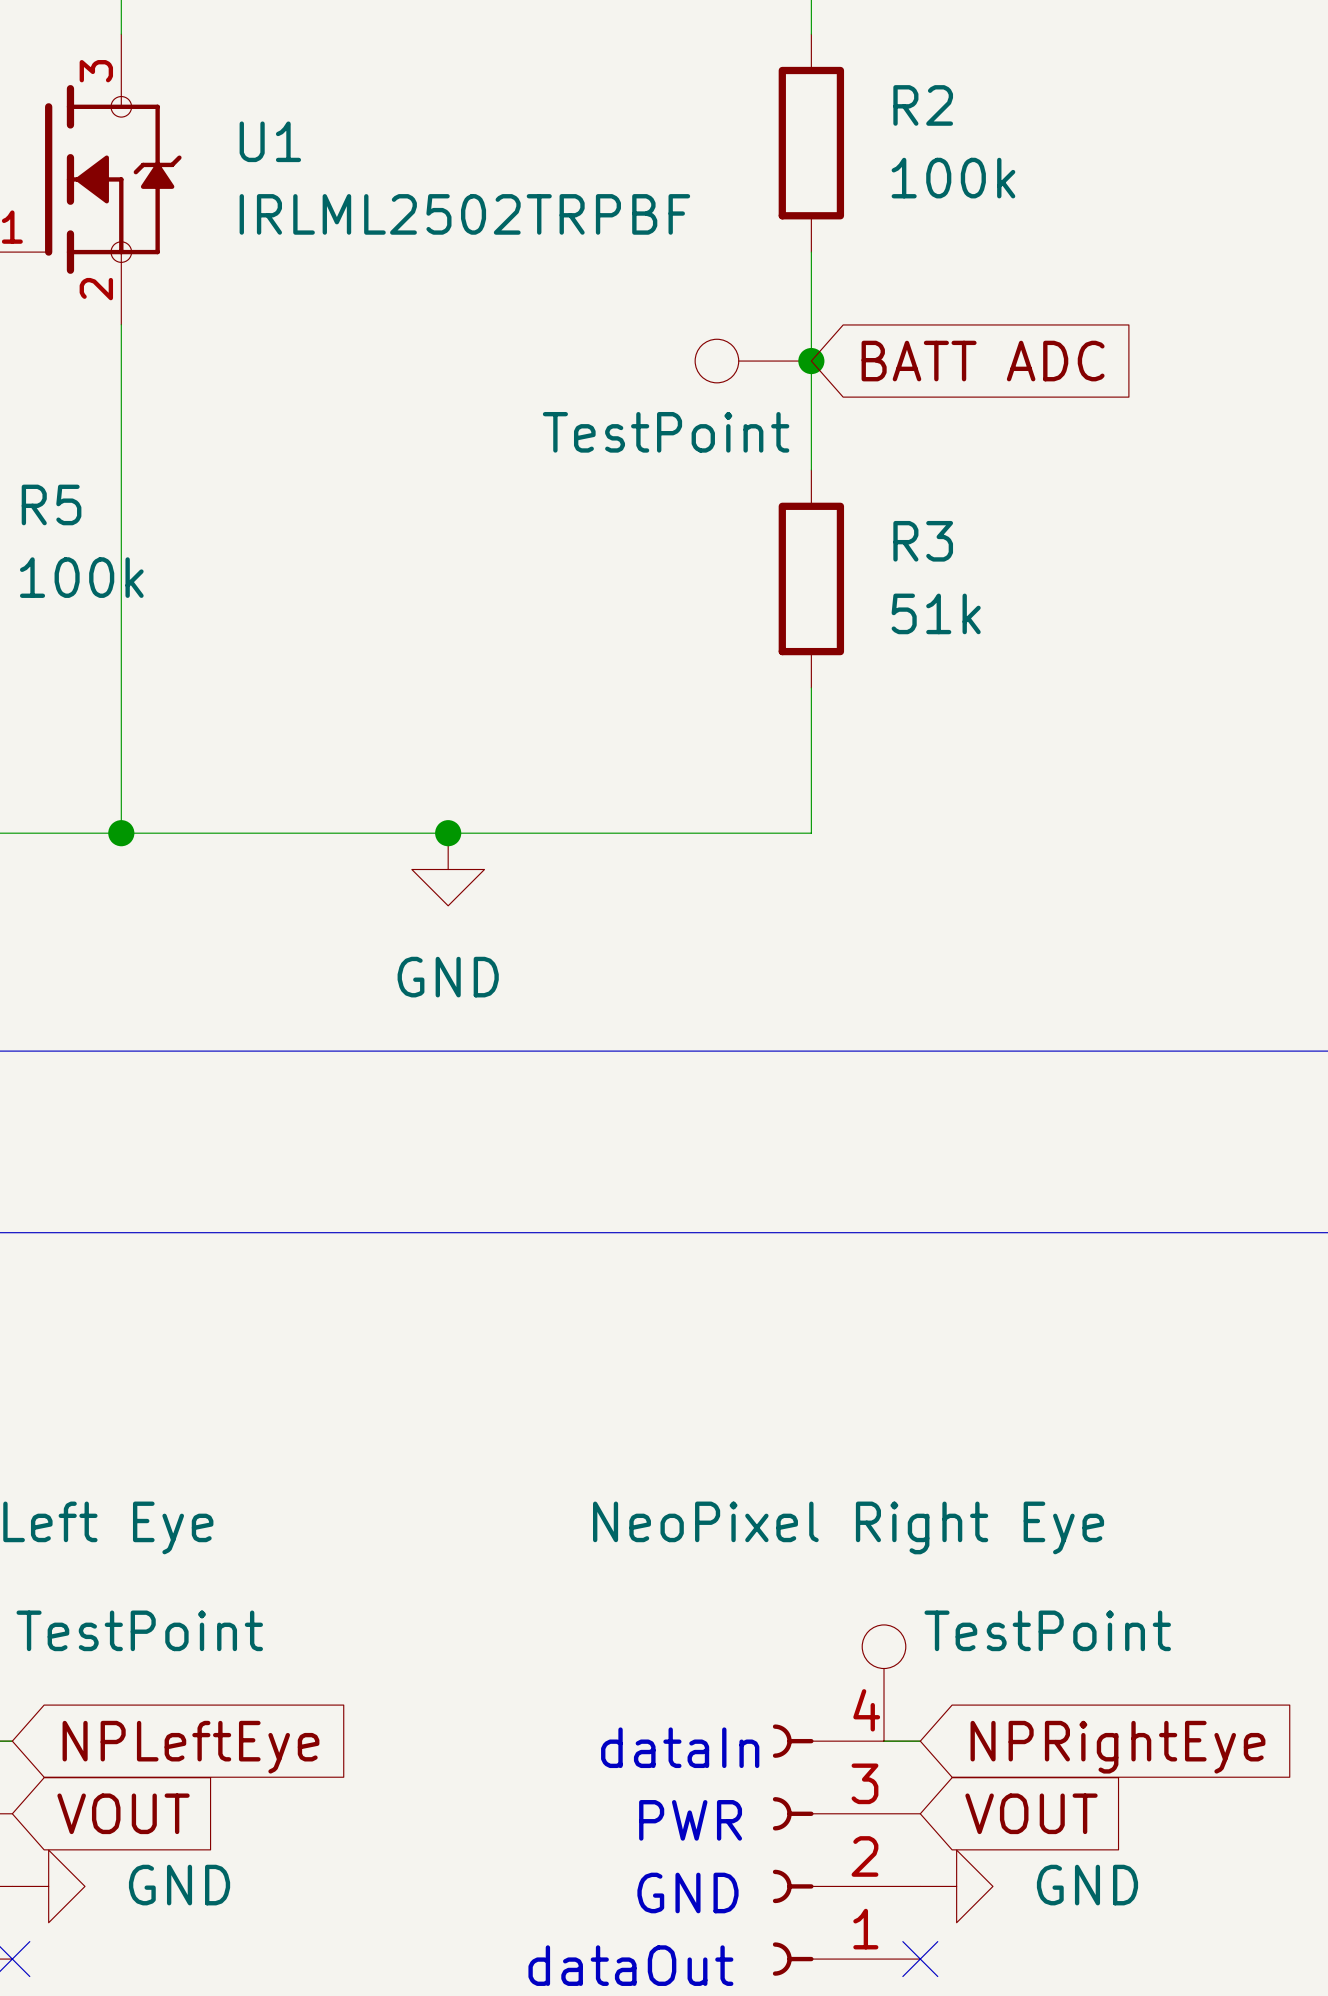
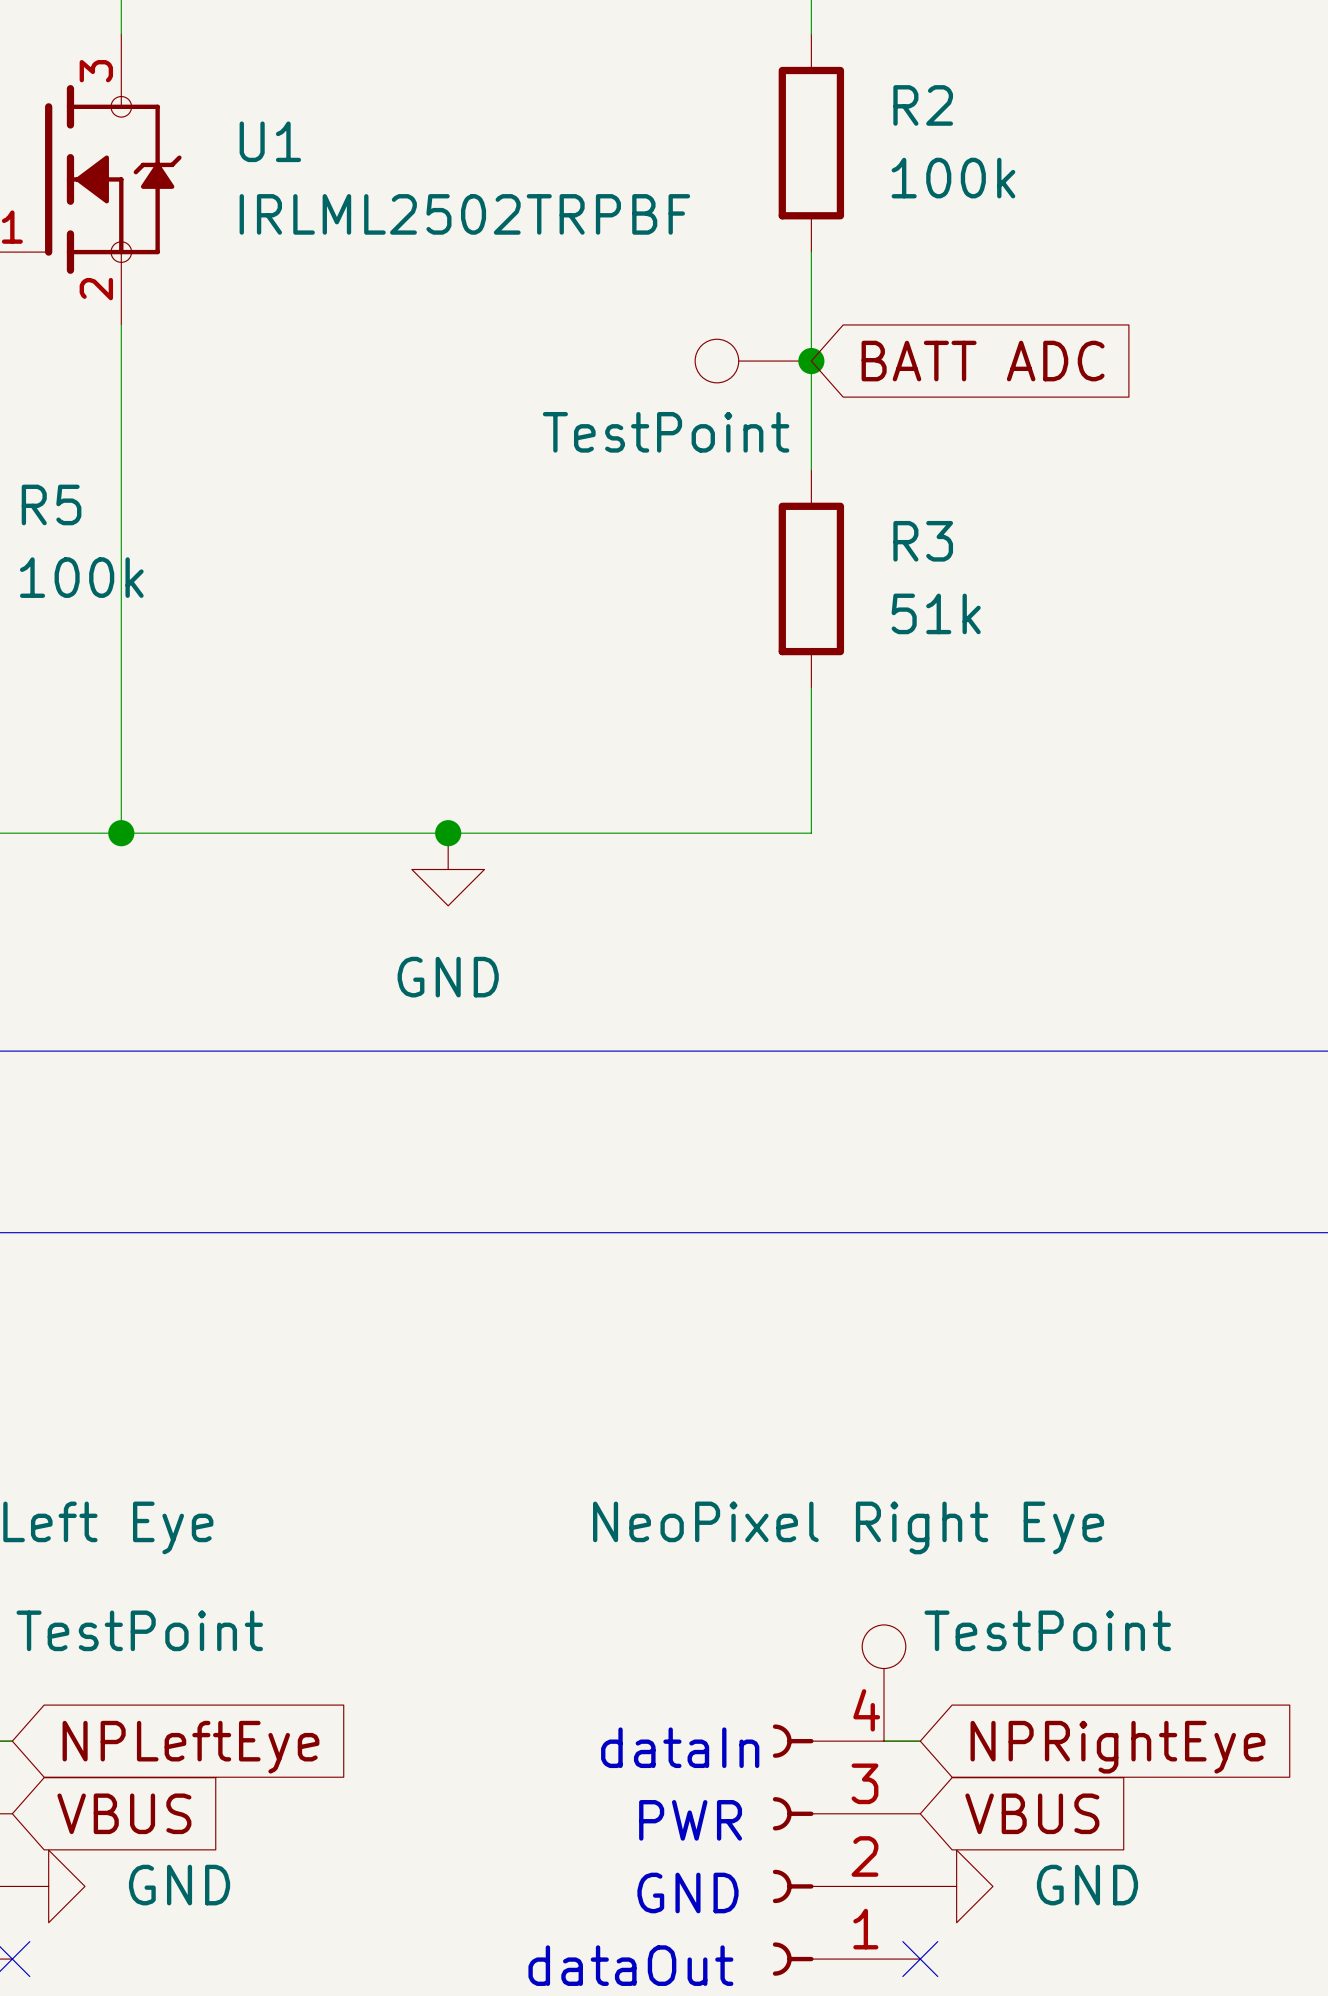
global label: VOUT (123, 1813) -> VBUS (124, 1813)
global label: VOUT (1031, 1813) -> VBUS (1032, 1813)

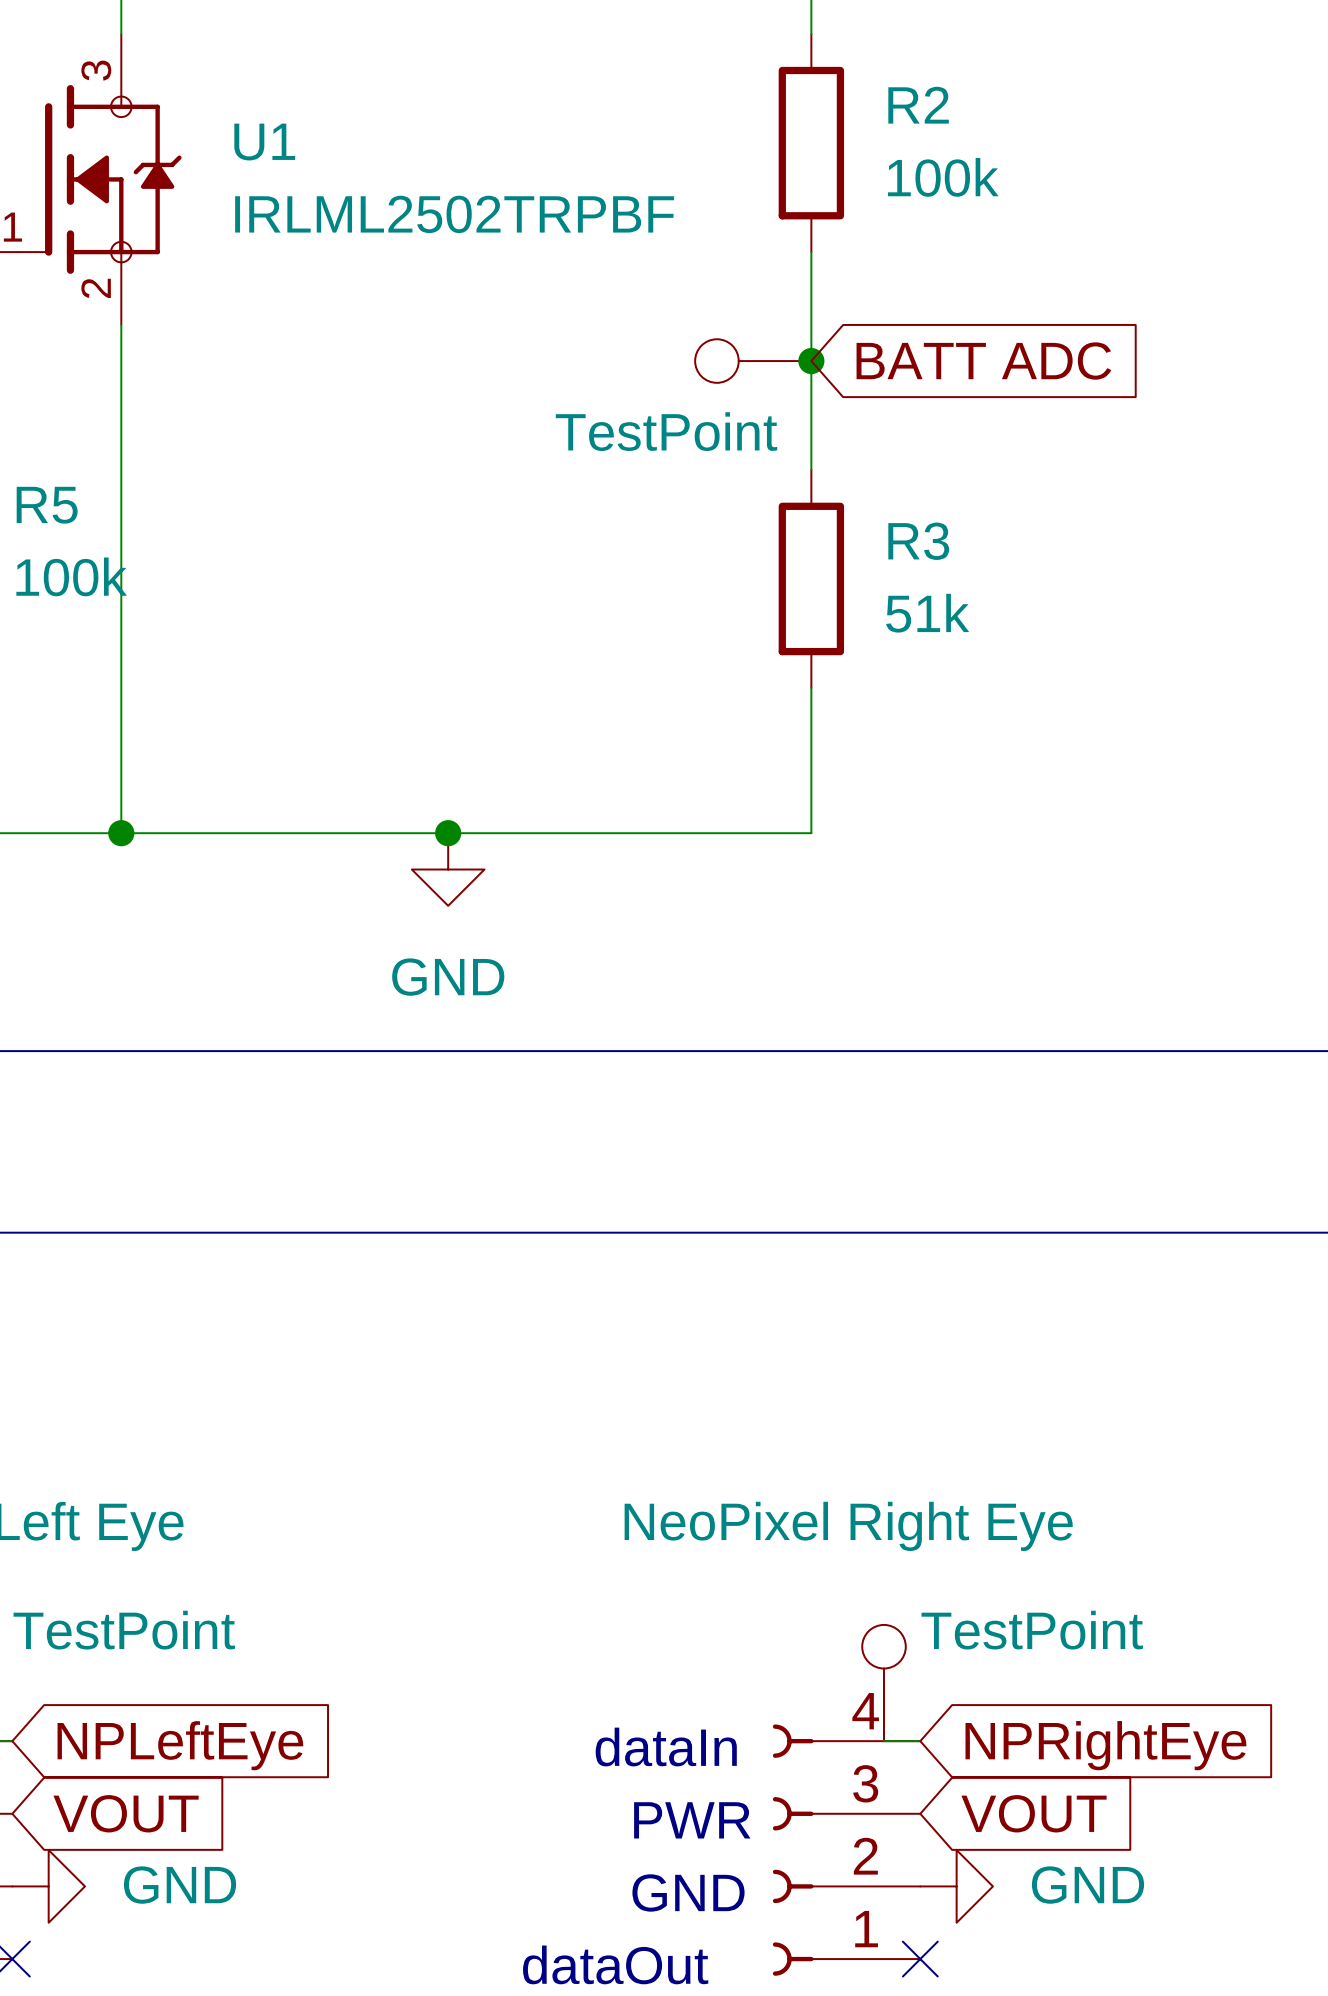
global label: VBUS (124, 1813) -> VOUT (126, 1813)
global label: VBUS (1032, 1813) -> VOUT (1034, 1813)

